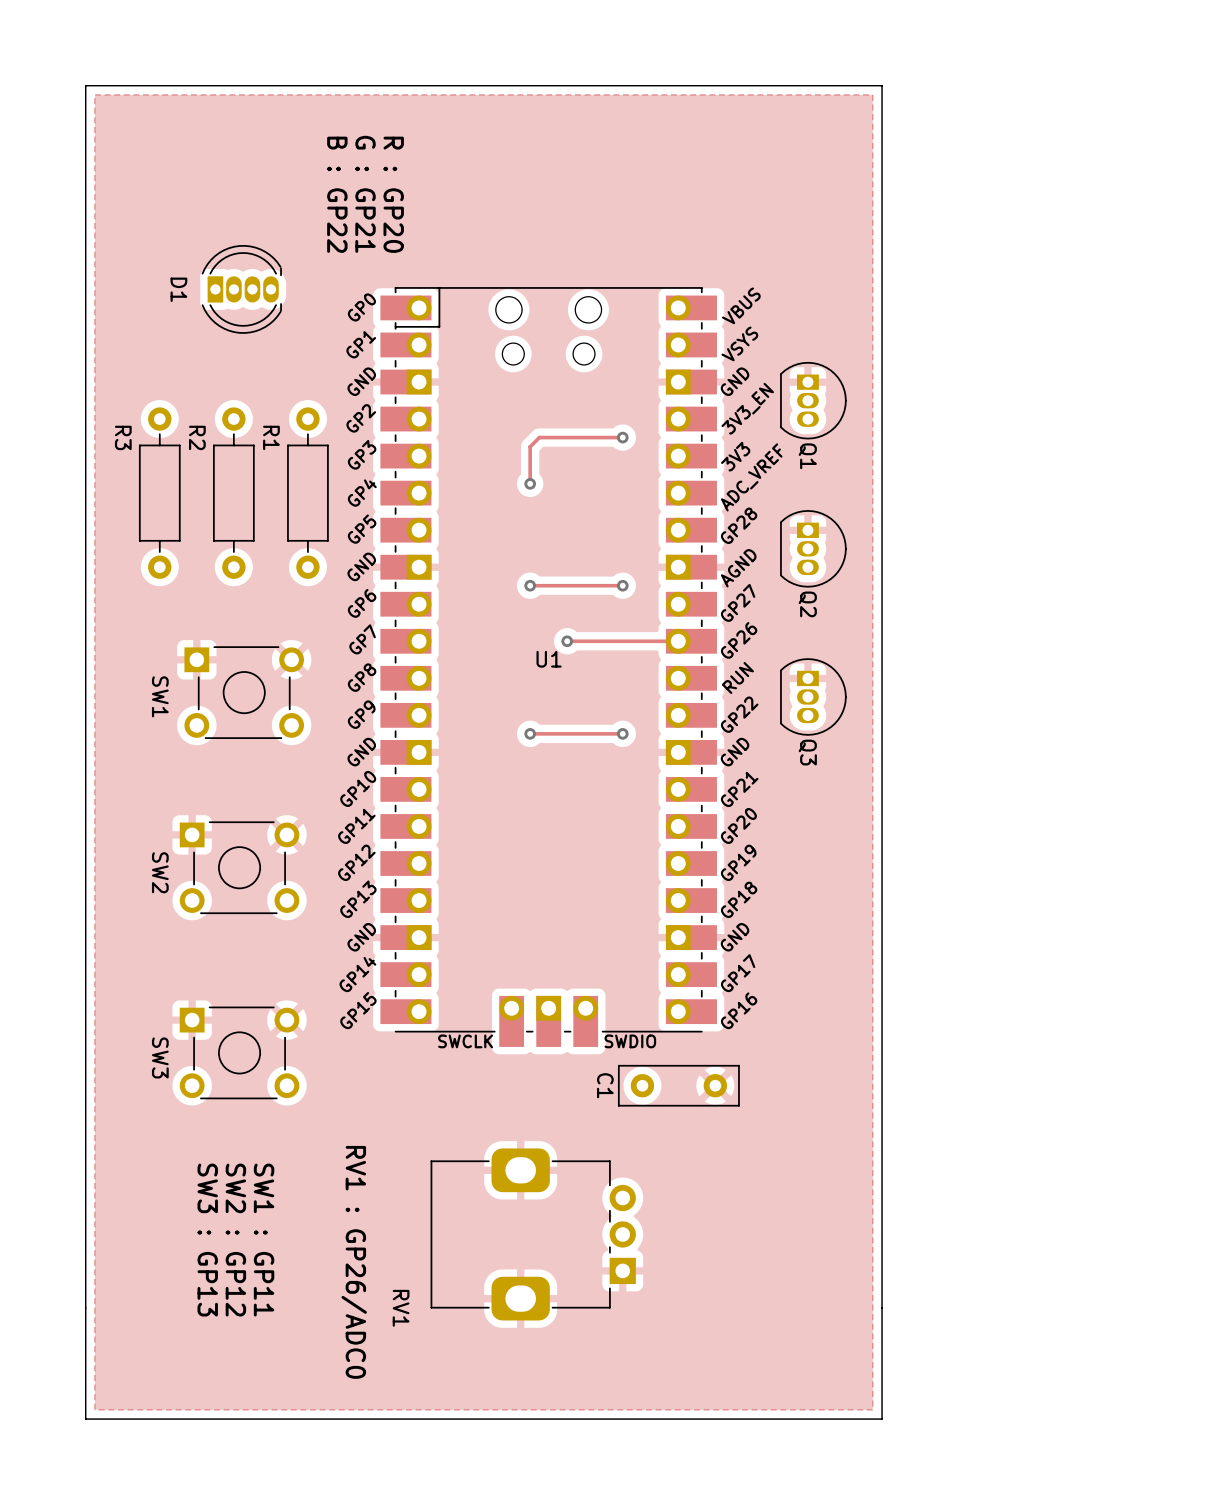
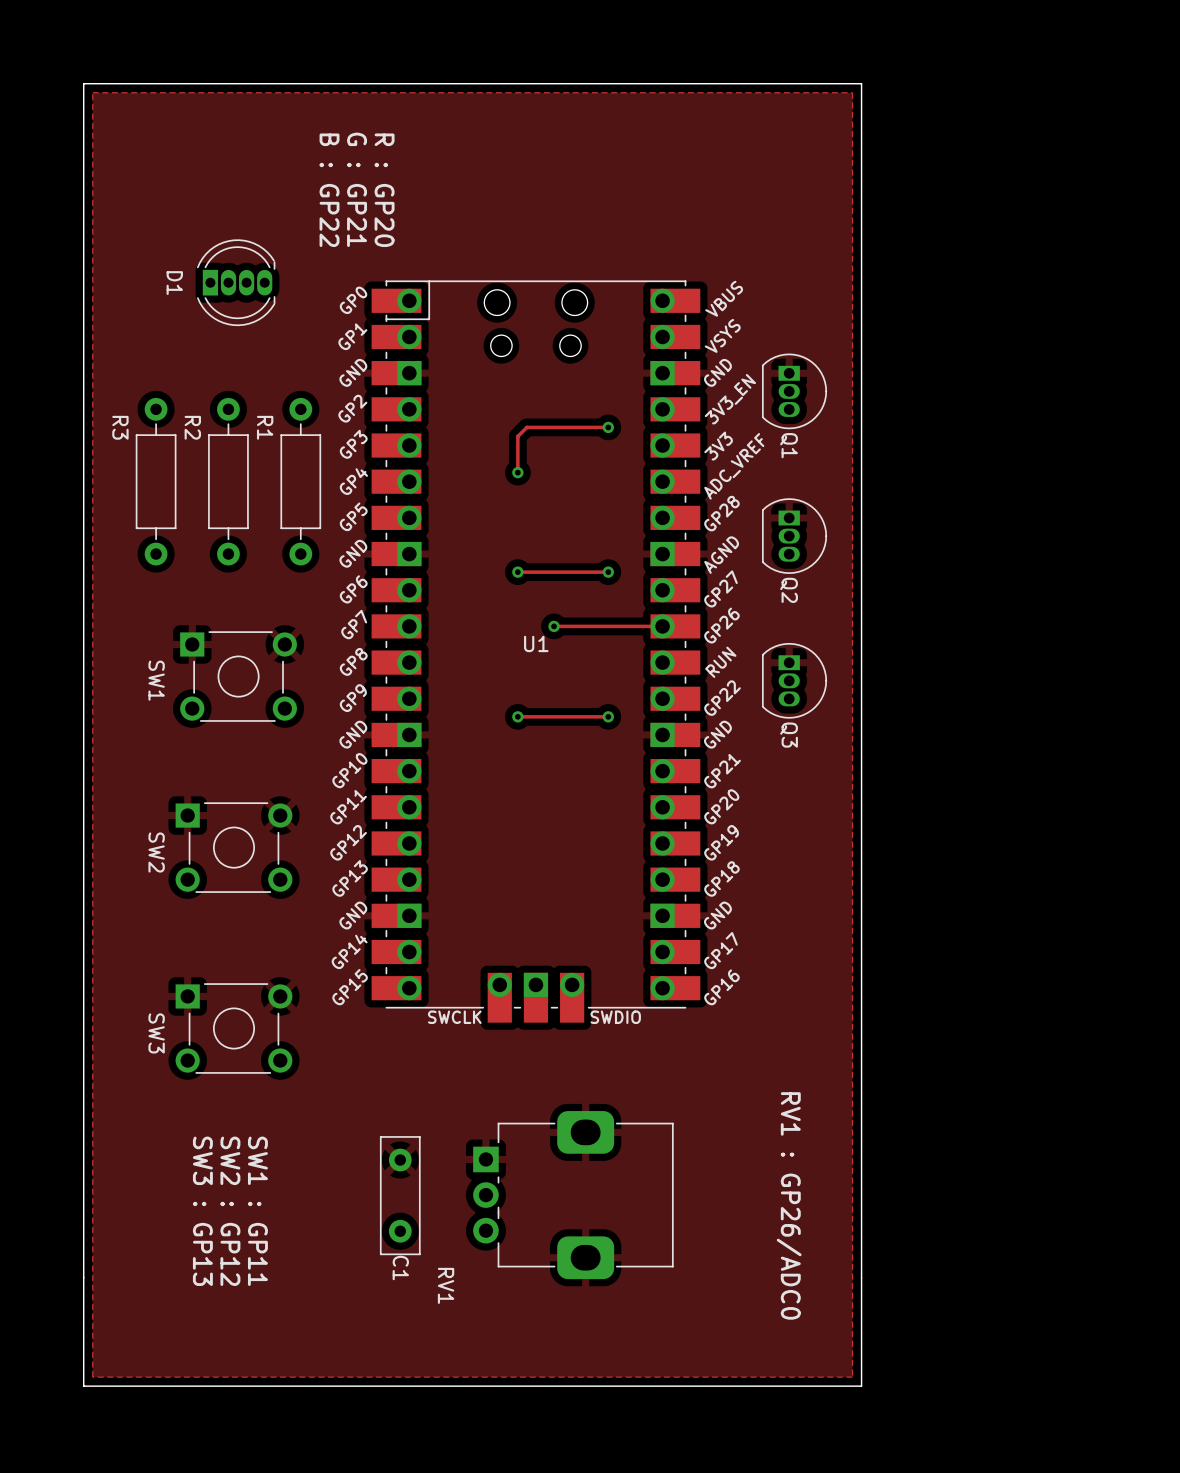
C1 name position: C1 (605, 1085) -> C1 (400, 1268)
C1 rotation: 0° (678, 1085) -> 90° clockwise (400, 1195)
C1 position: (678, 1085) -> (400, 1195)
RV1 rotation: 0° (533, 1234) -> 180° (573, 1195)
text: none -> RV1 : GP26/ADC0 (789, 1205)
text: RV1 : GP26/ADC0 (354, 1262) -> none

